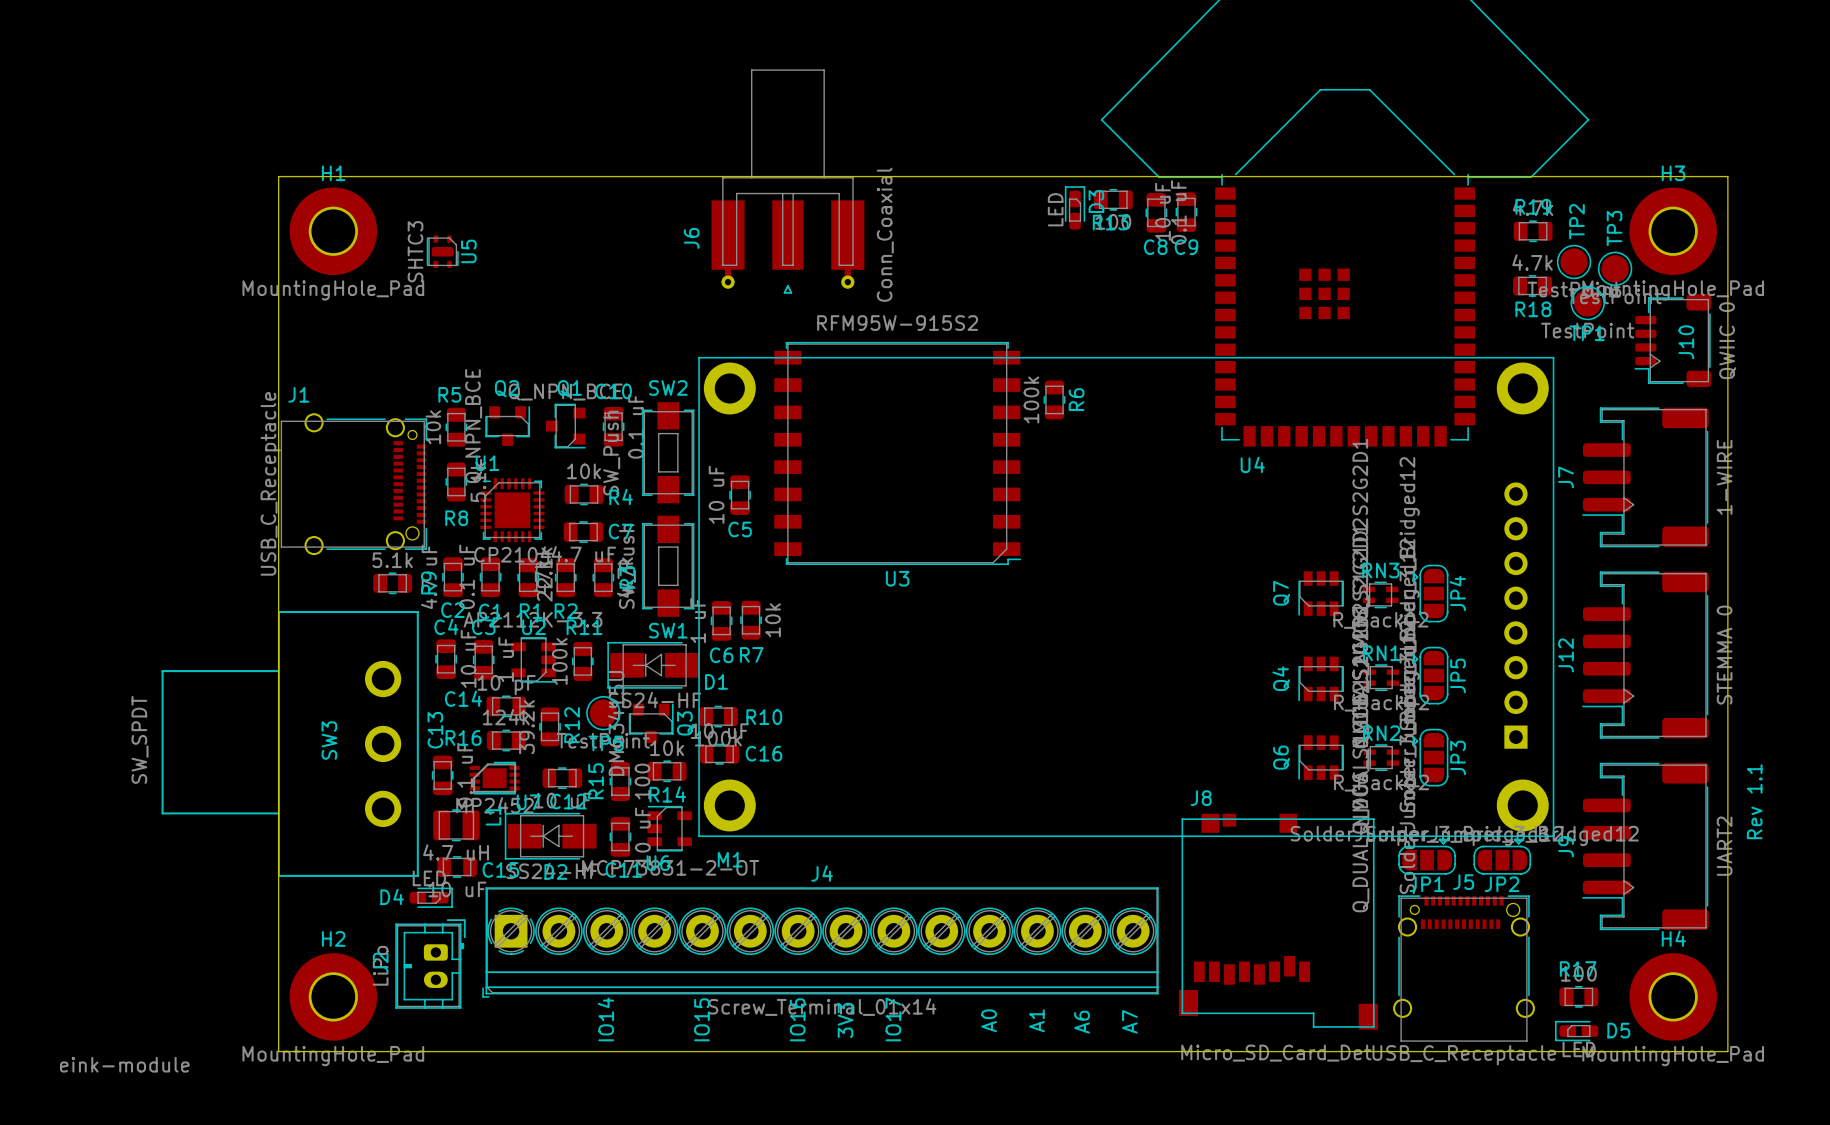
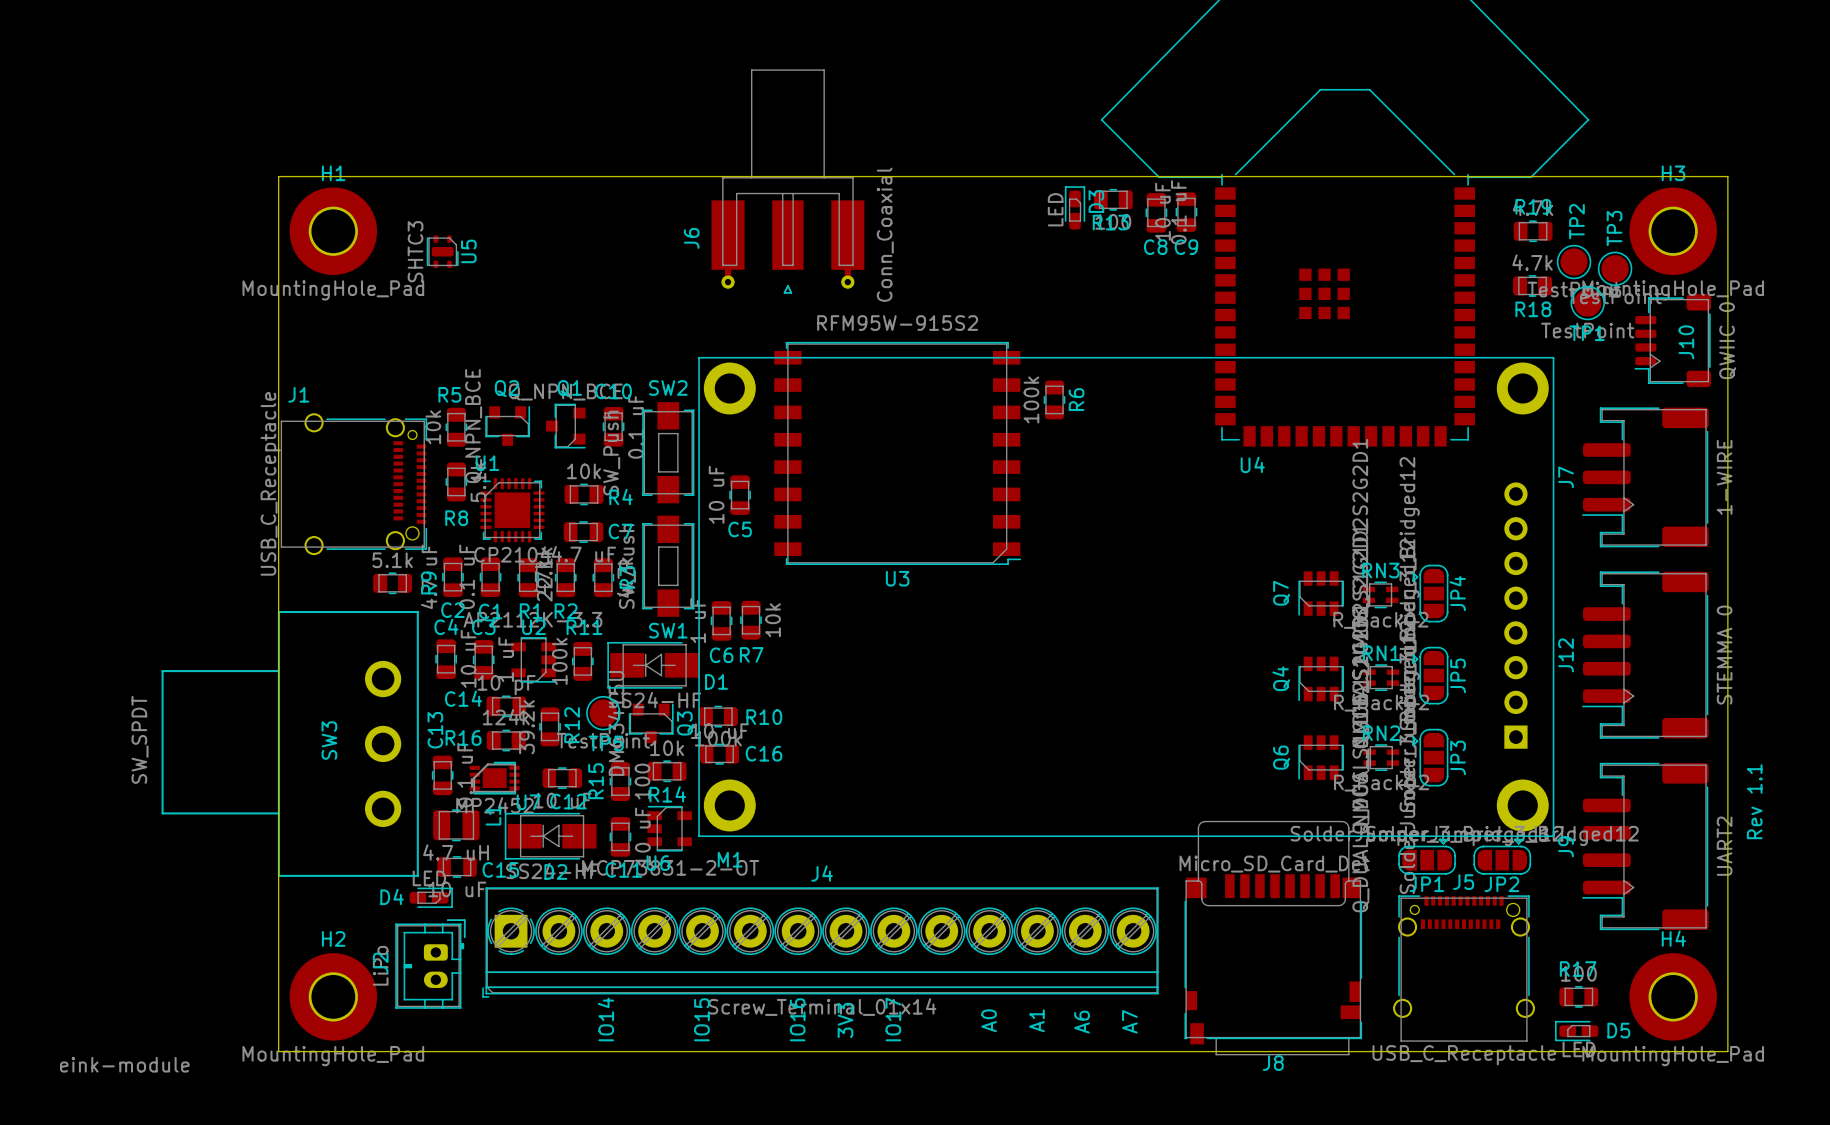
J8 name position: J8 (1201, 798) -> J8 (1273, 1063)
J8 footprint: [1178, 813, 1378, 1030] -> [1184, 820, 1363, 1056]
J8 value position: Micro_SD_Card_Det (1276, 1053) -> Micro_SD_Card_Det (1274, 864)

